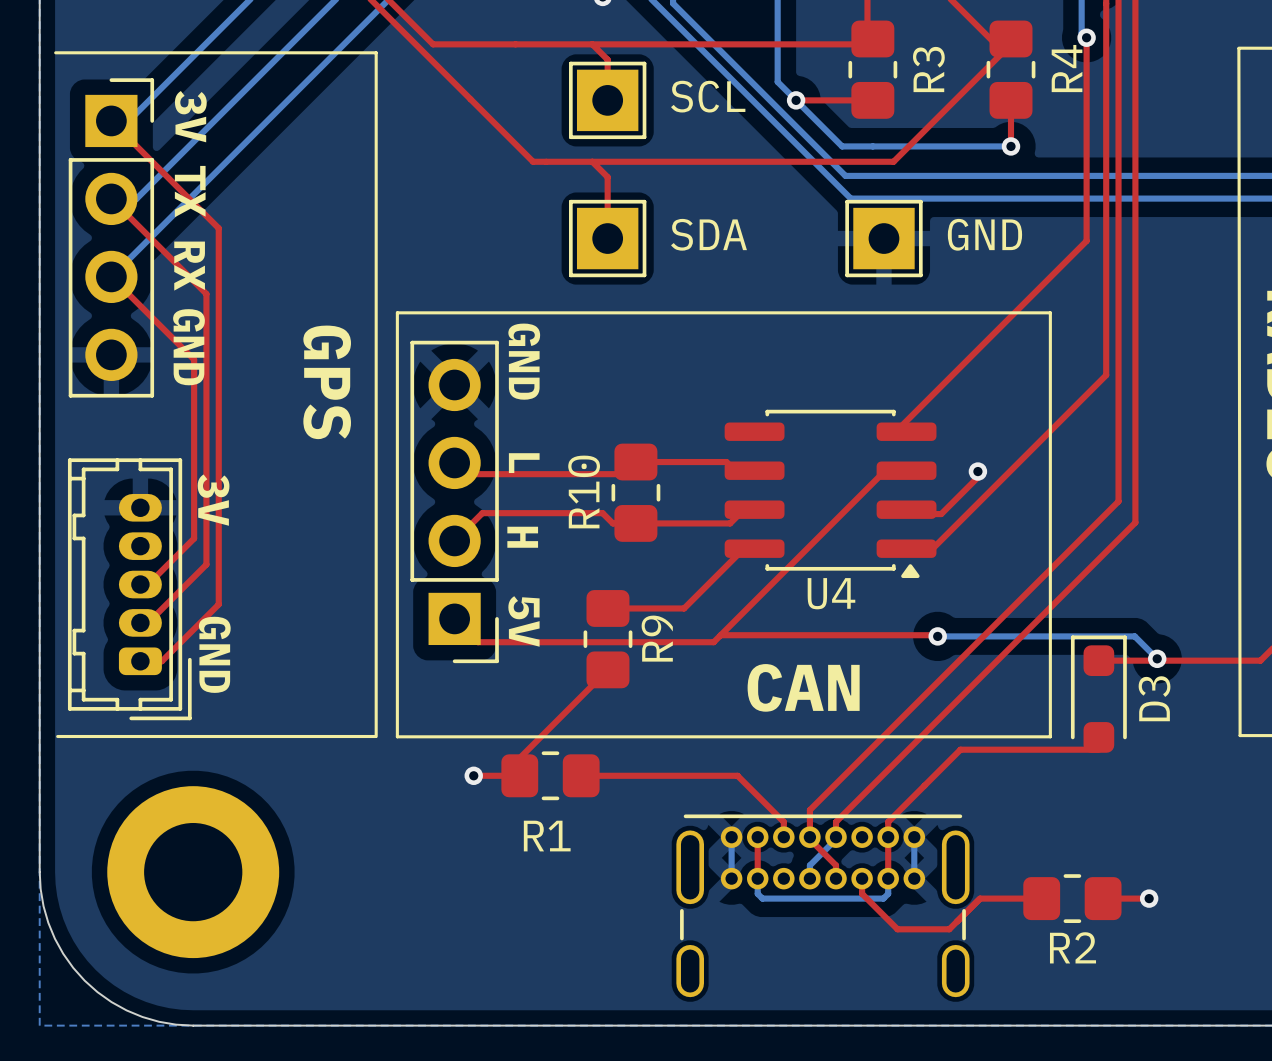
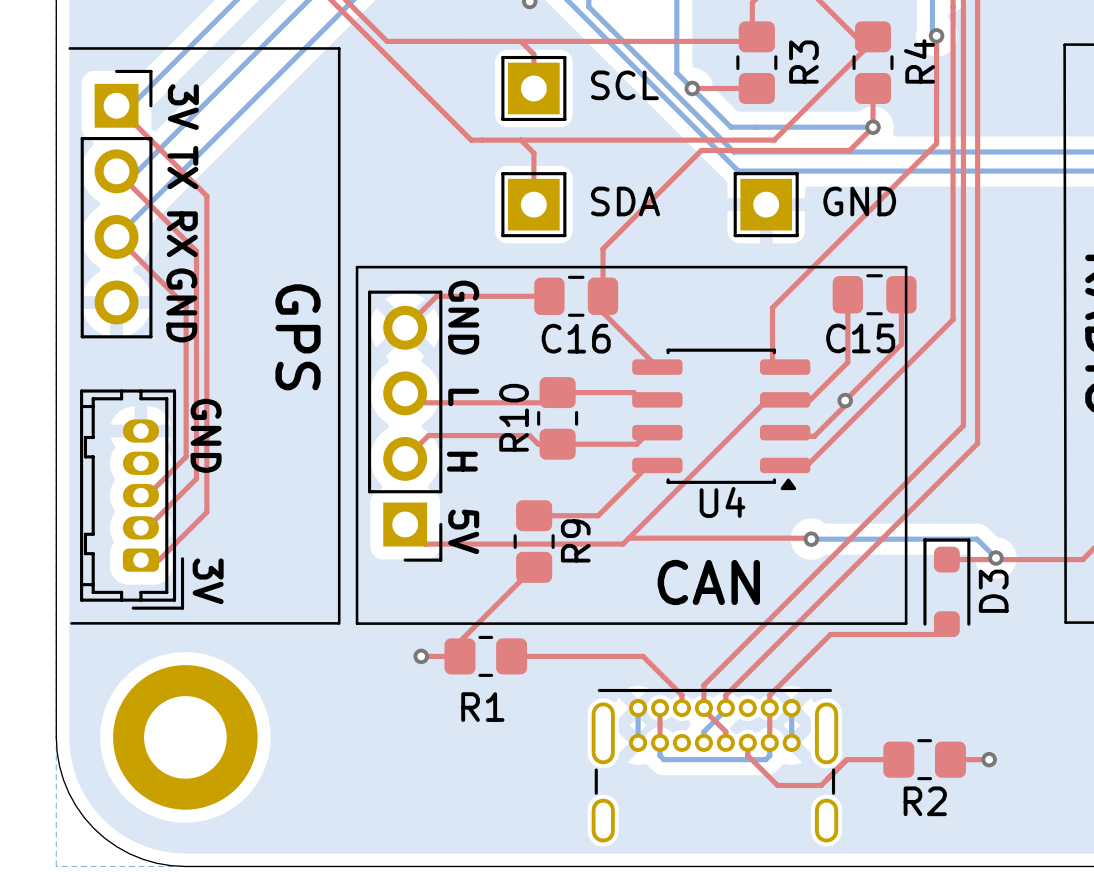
top track: none -> (873, 127) (849, 150) (701, 150) (603, 248) (602, 312) (657, 367)
top track: (1086, 166) (1086, 240) (891, 436) -> (936, 143) (772, 307) (772, 370)
top track: none -> (847, 294) (847, 362) (810, 399) (785, 399)
C15: none -> (874, 294)
top track: none -> (901, 294) (901, 344) (845, 400)
top track: none -> (549, 296) (436, 296) (405, 327)
C16: none -> (576, 296)
text: 3V (213, 500) -> GND (206, 435)
text: GND (214, 654) -> none
text: none -> 3V (208, 581)

